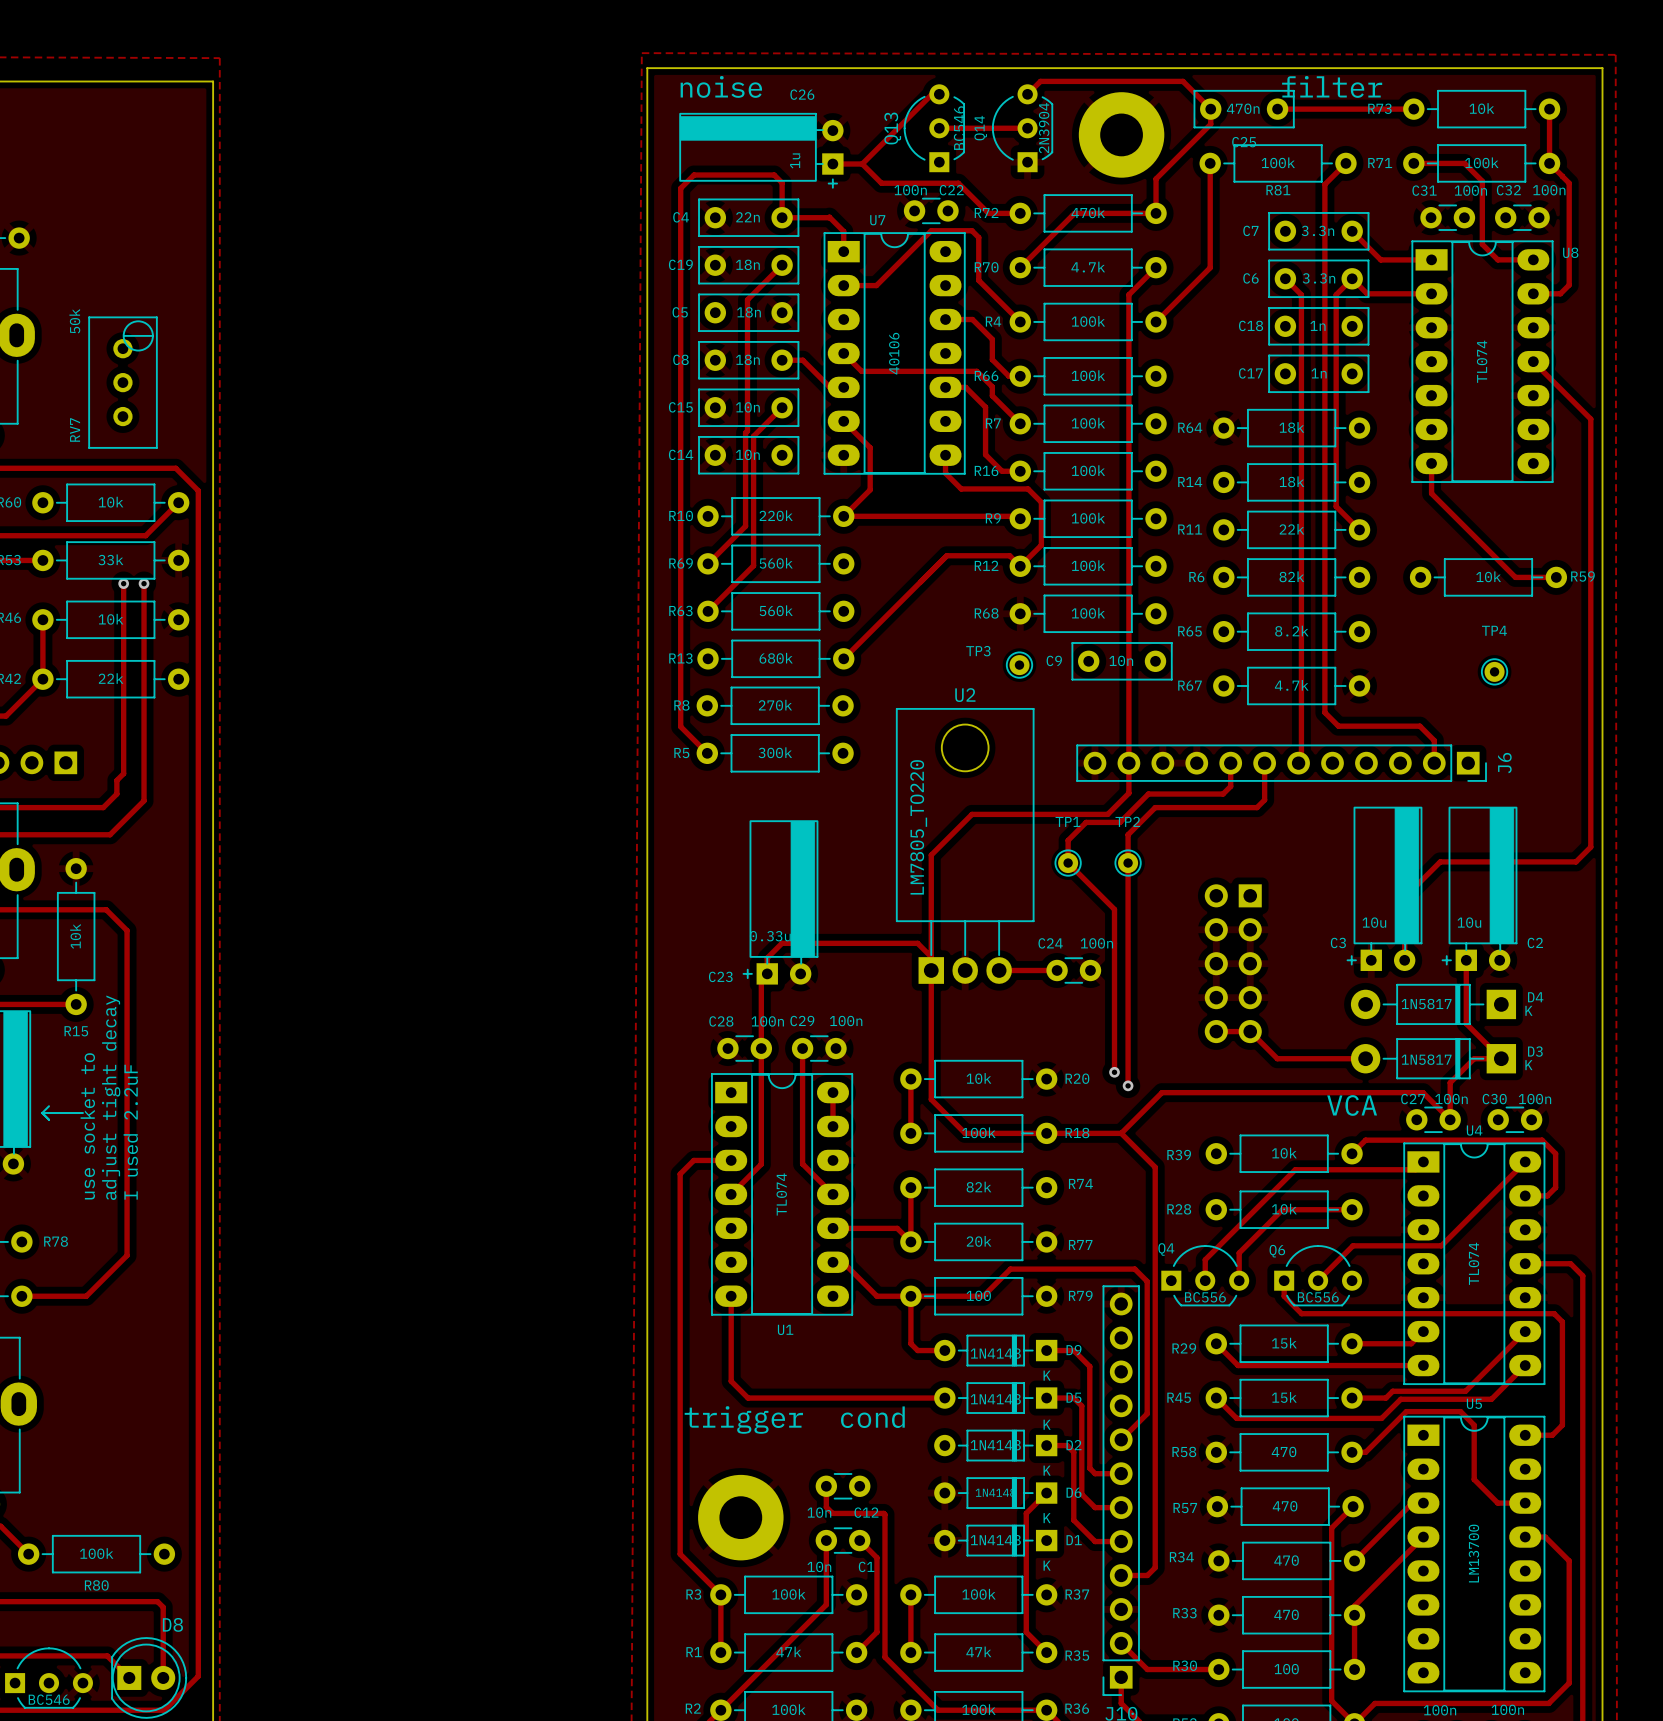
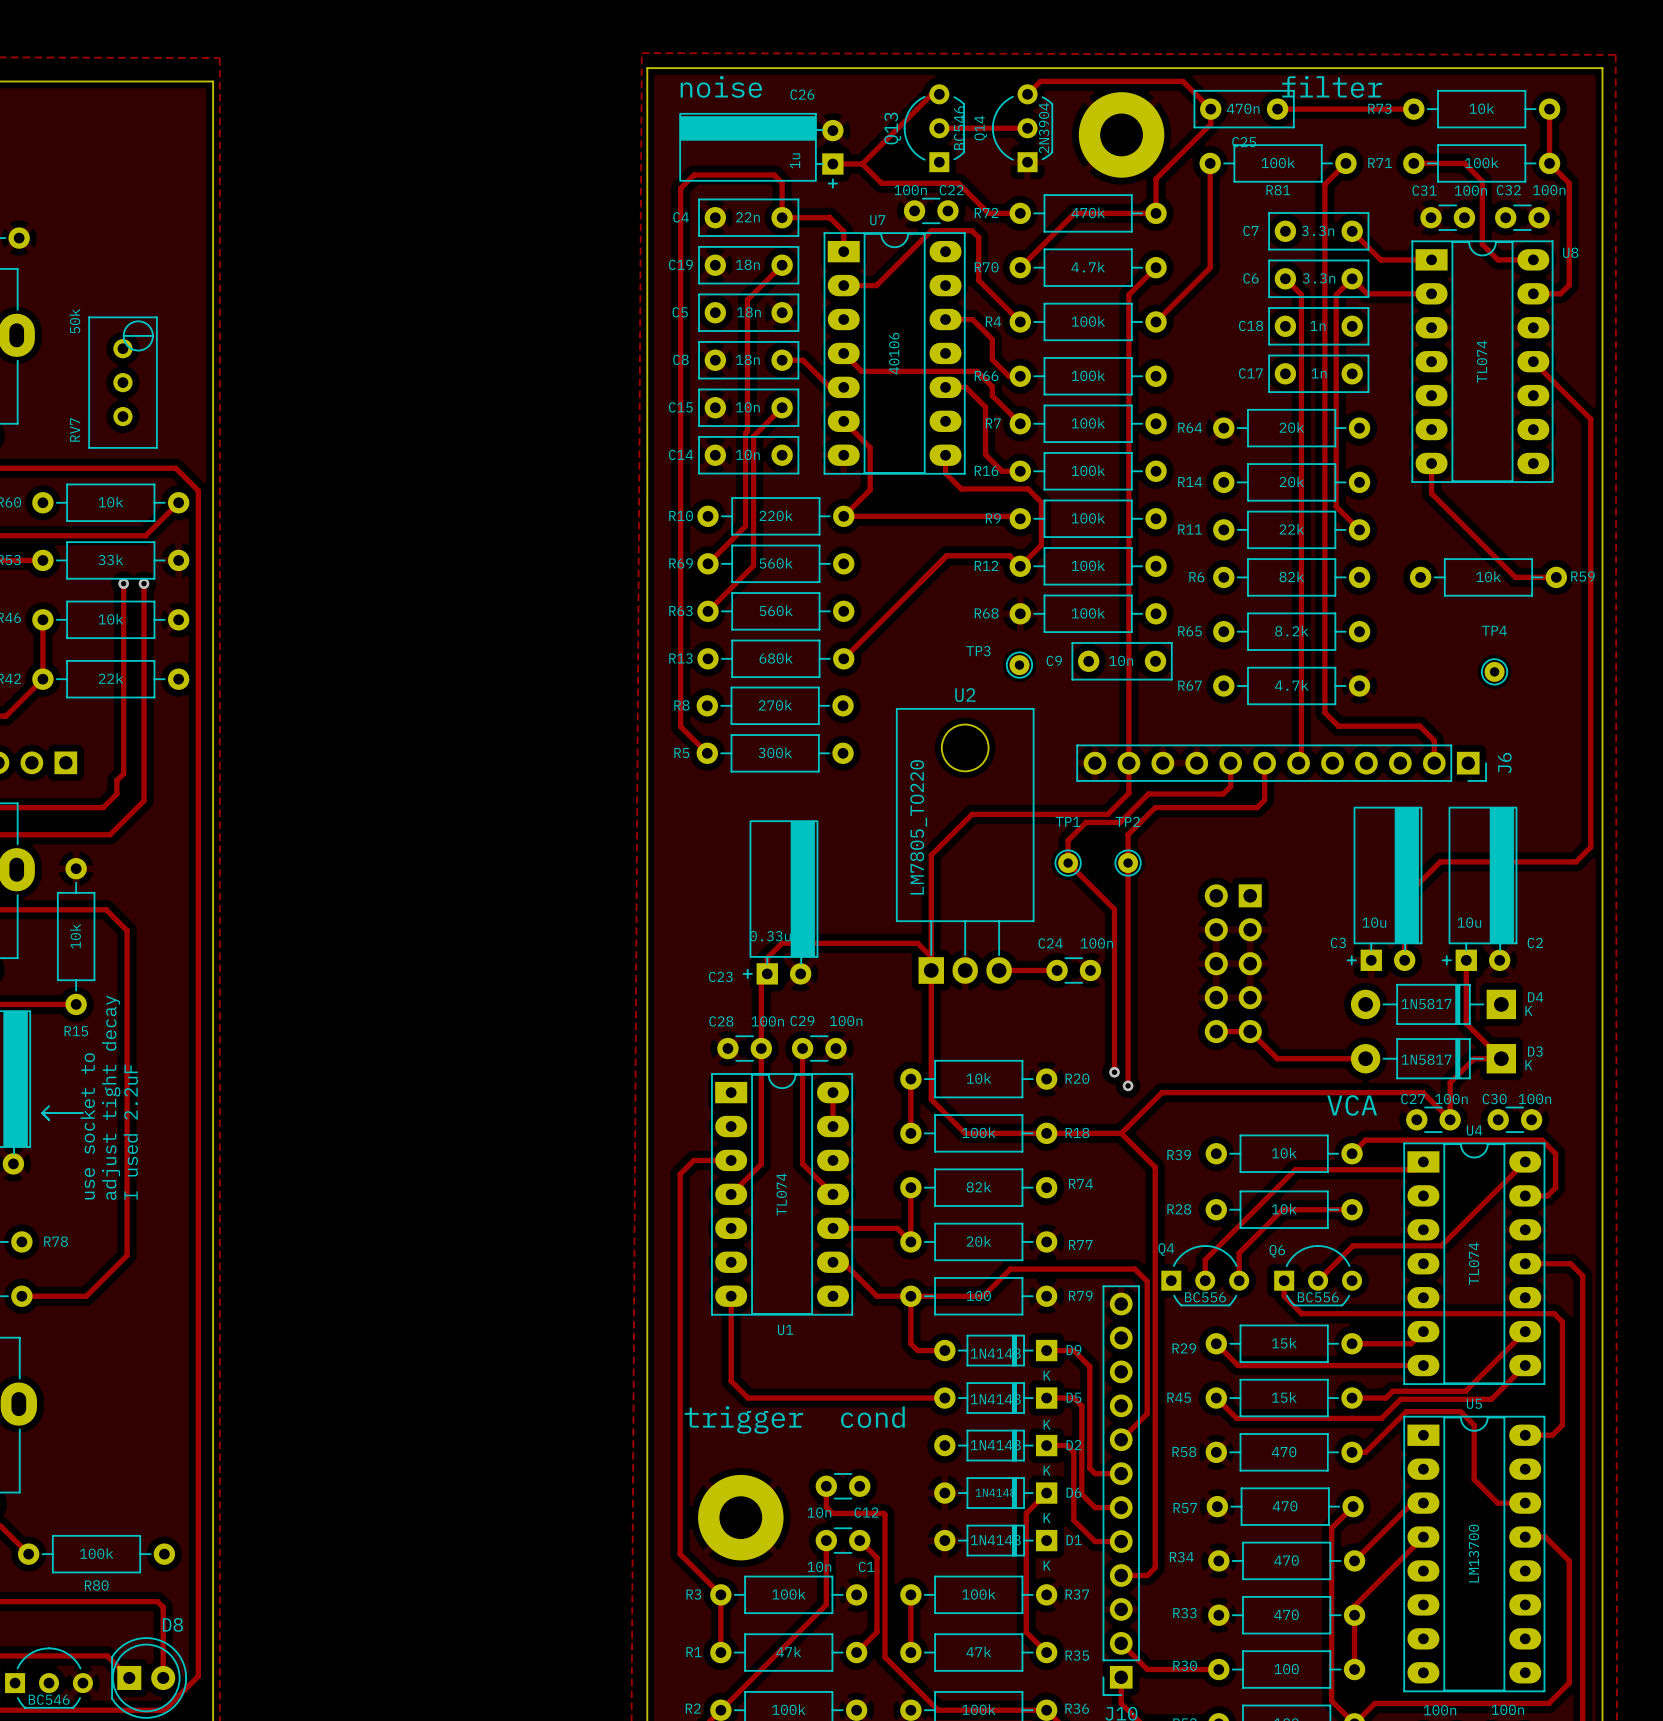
R64 value: 18k (1291, 427) -> 20k (1291, 427)
R14 value: 18k (1291, 481) -> 20k (1291, 481)

